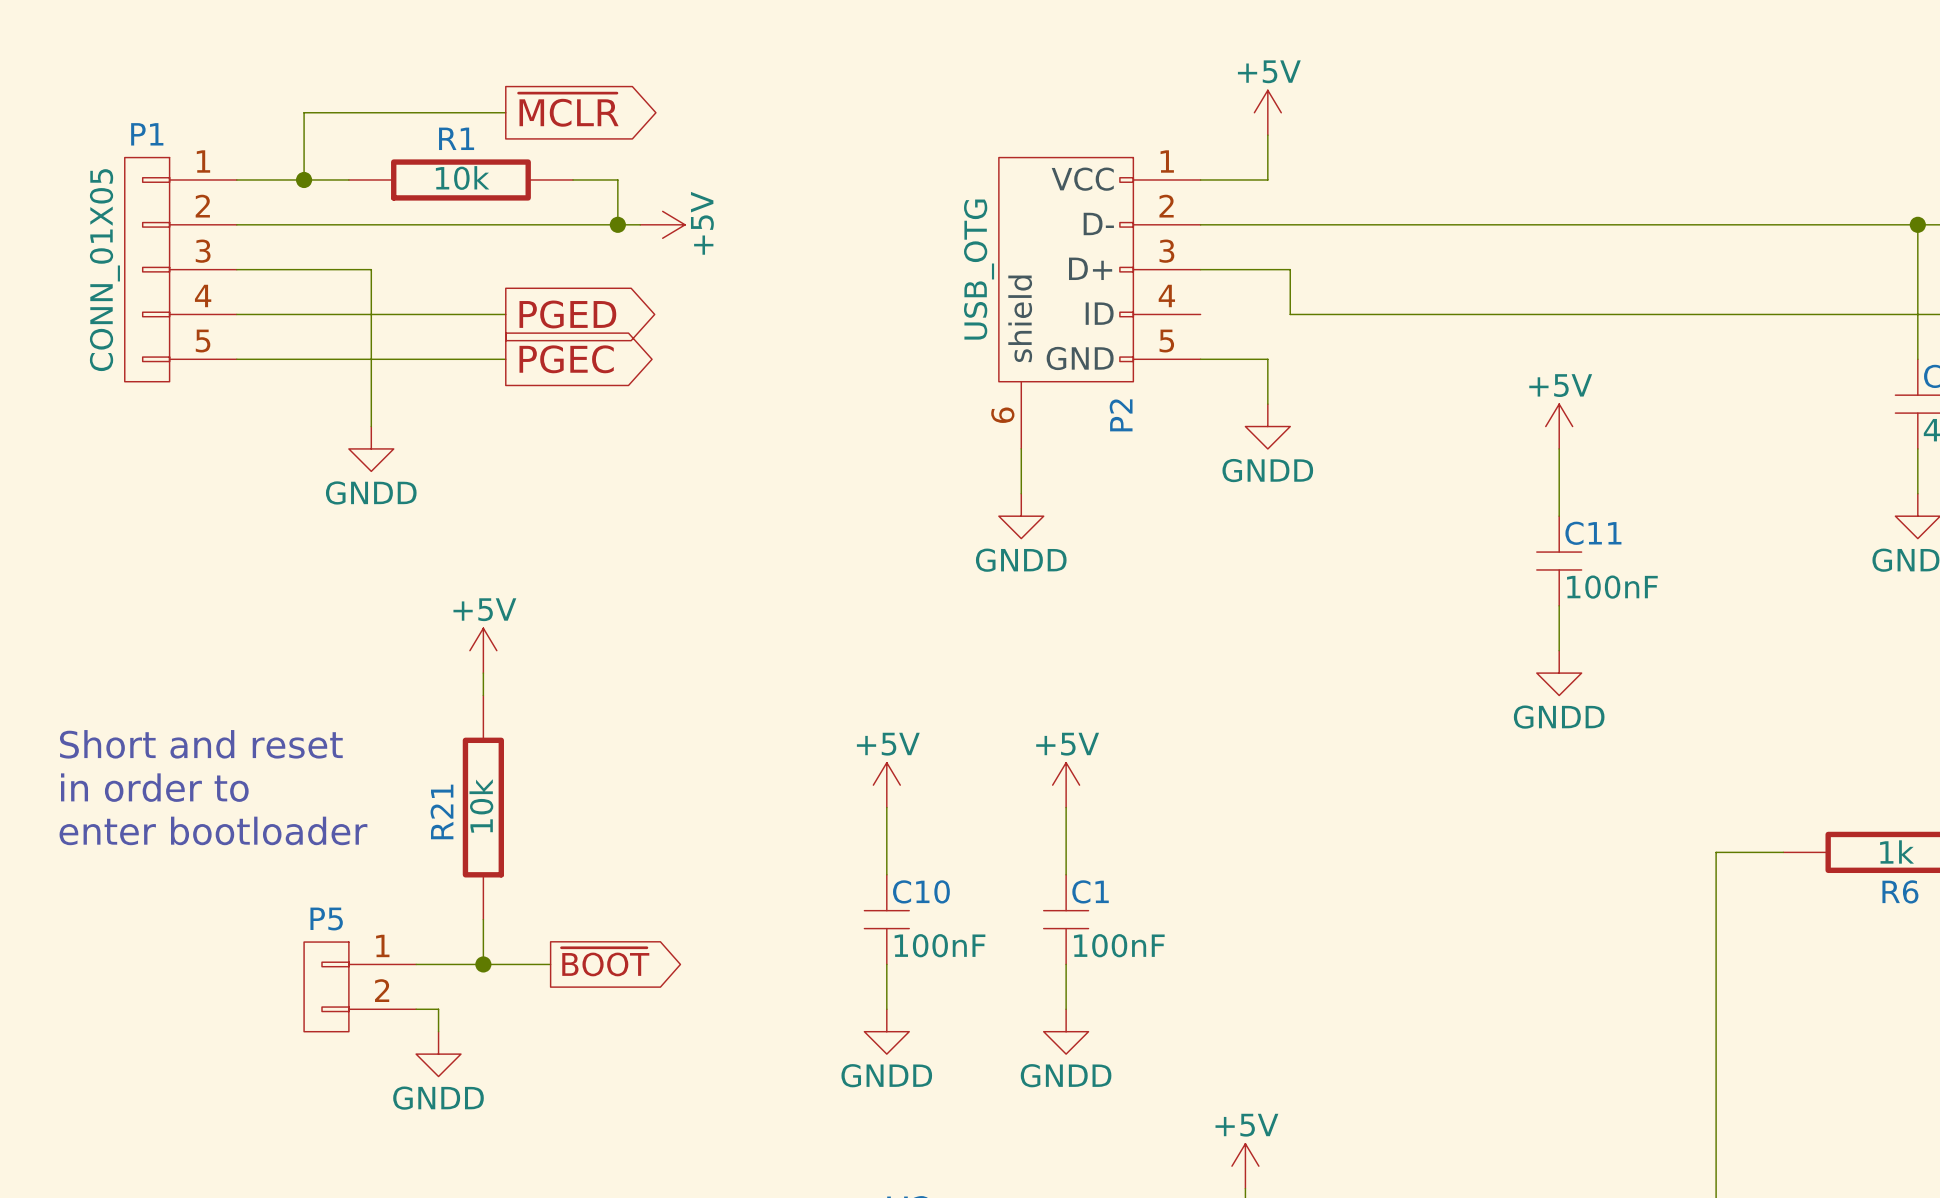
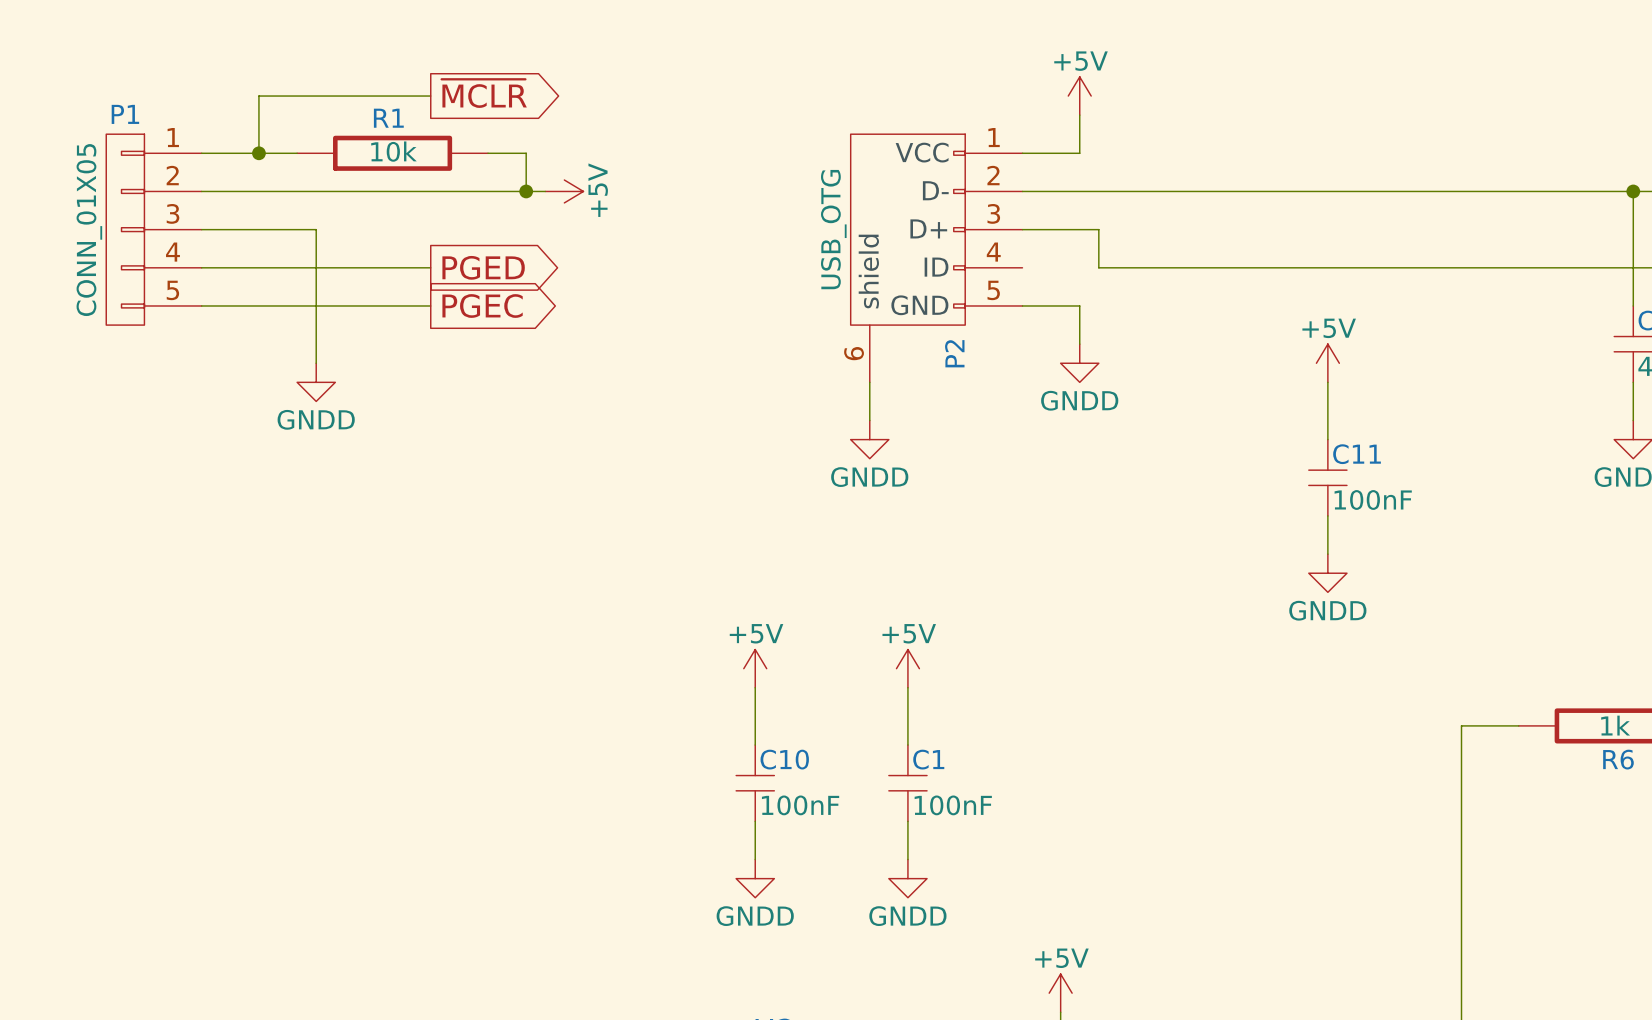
power symbol: +5V (483, 650) -> none
wire: (483, 673) (483, 695) -> none
text: Short and reset (201, 744) -> none
text: in order to (154, 787) -> none
R21: 10k (483, 807) -> none
text: enter bootloader (213, 830) -> none
wire: (483, 919) (483, 964) -> none
global label: ~{BOOT} (605, 962) -> none
wire: (416, 964) (550, 964) -> none
junction: (483, 964) -> none
P5: (360, 986) -> none
wire: (416, 1009) (438, 1009) (438, 1031) -> none
power symbol: GNDD (438, 1054) -> none

